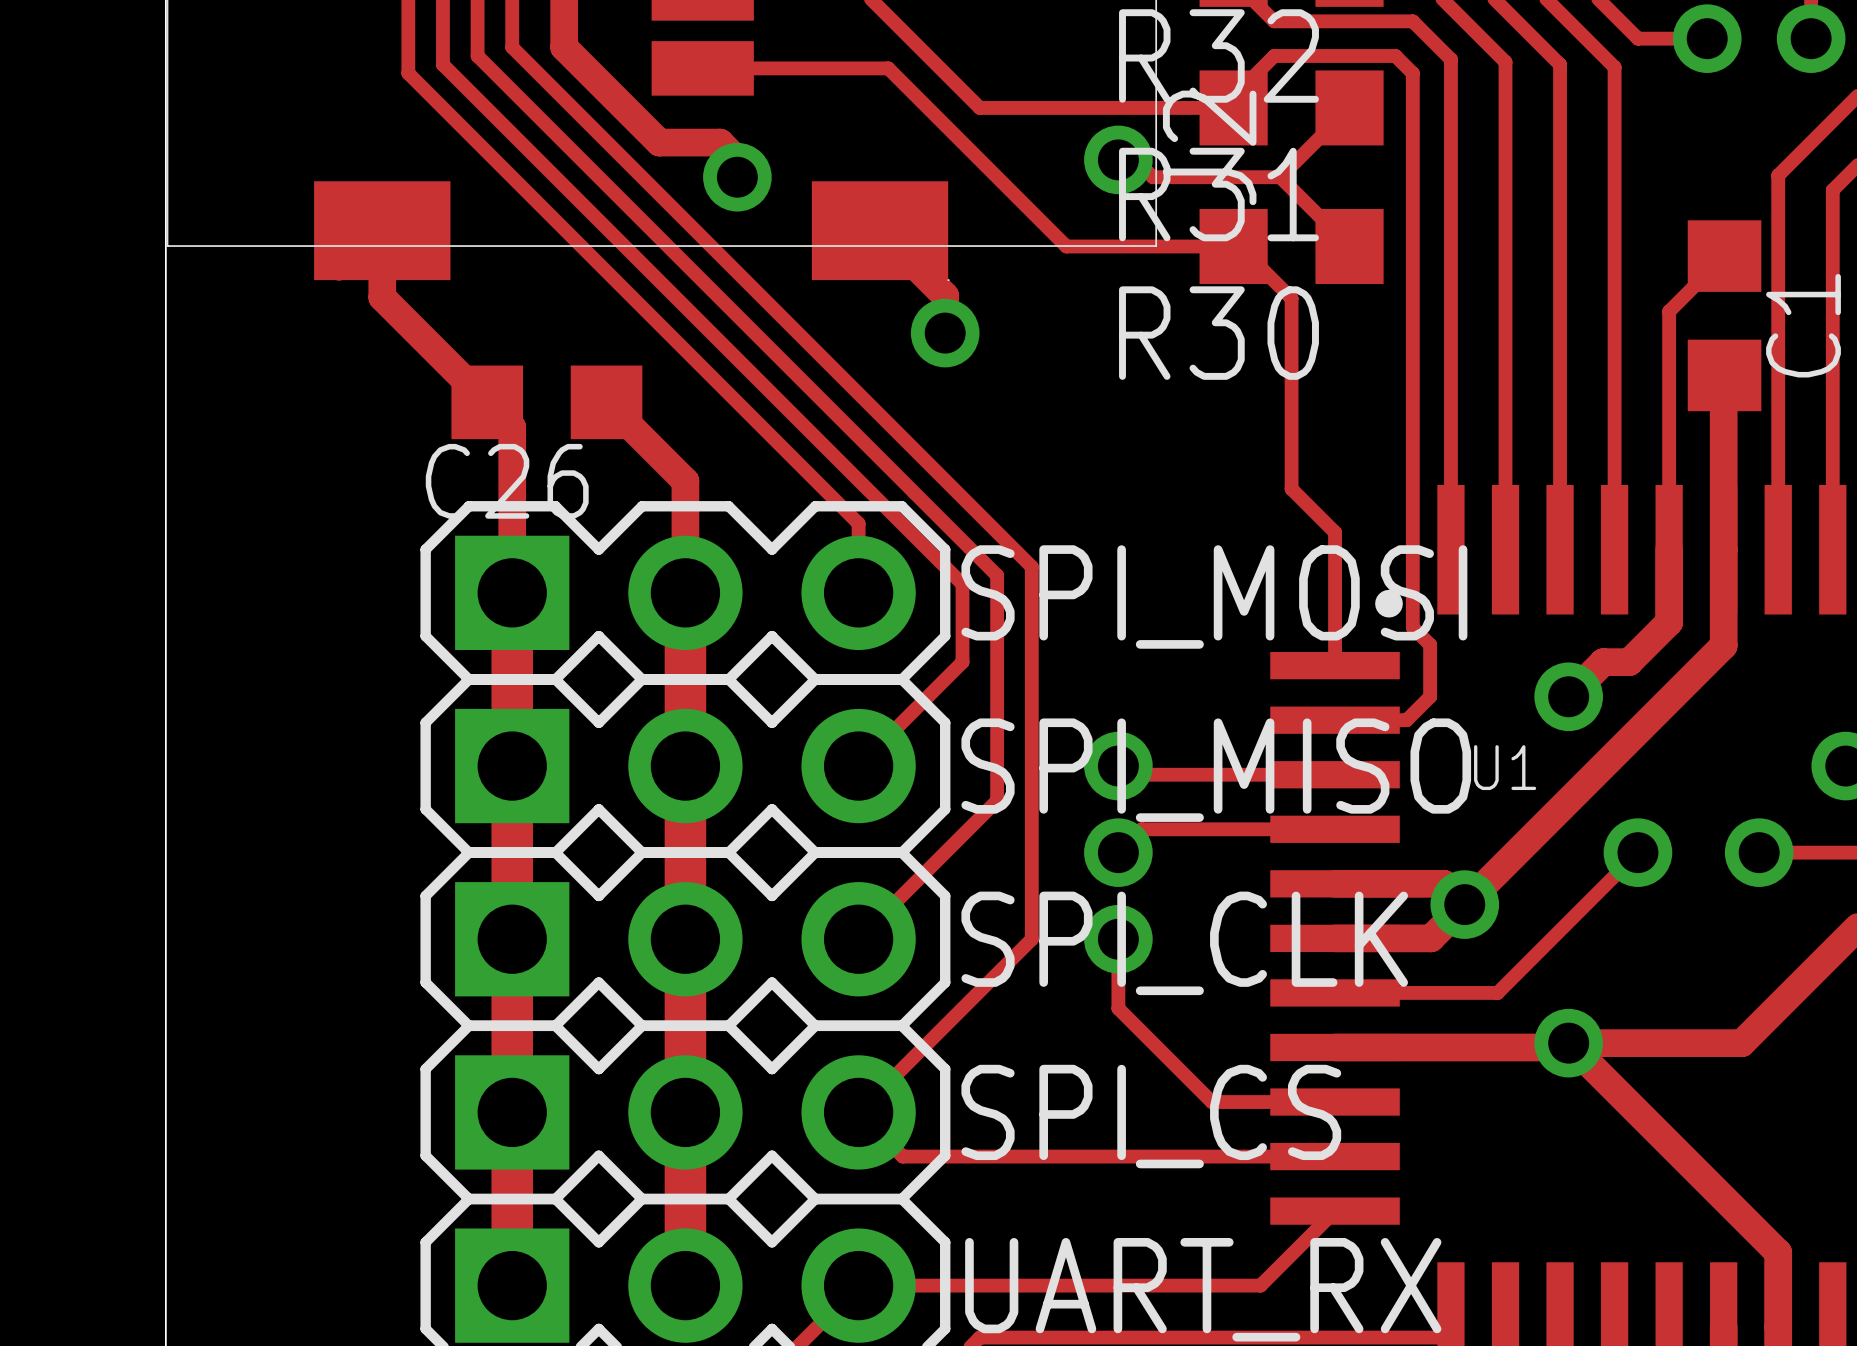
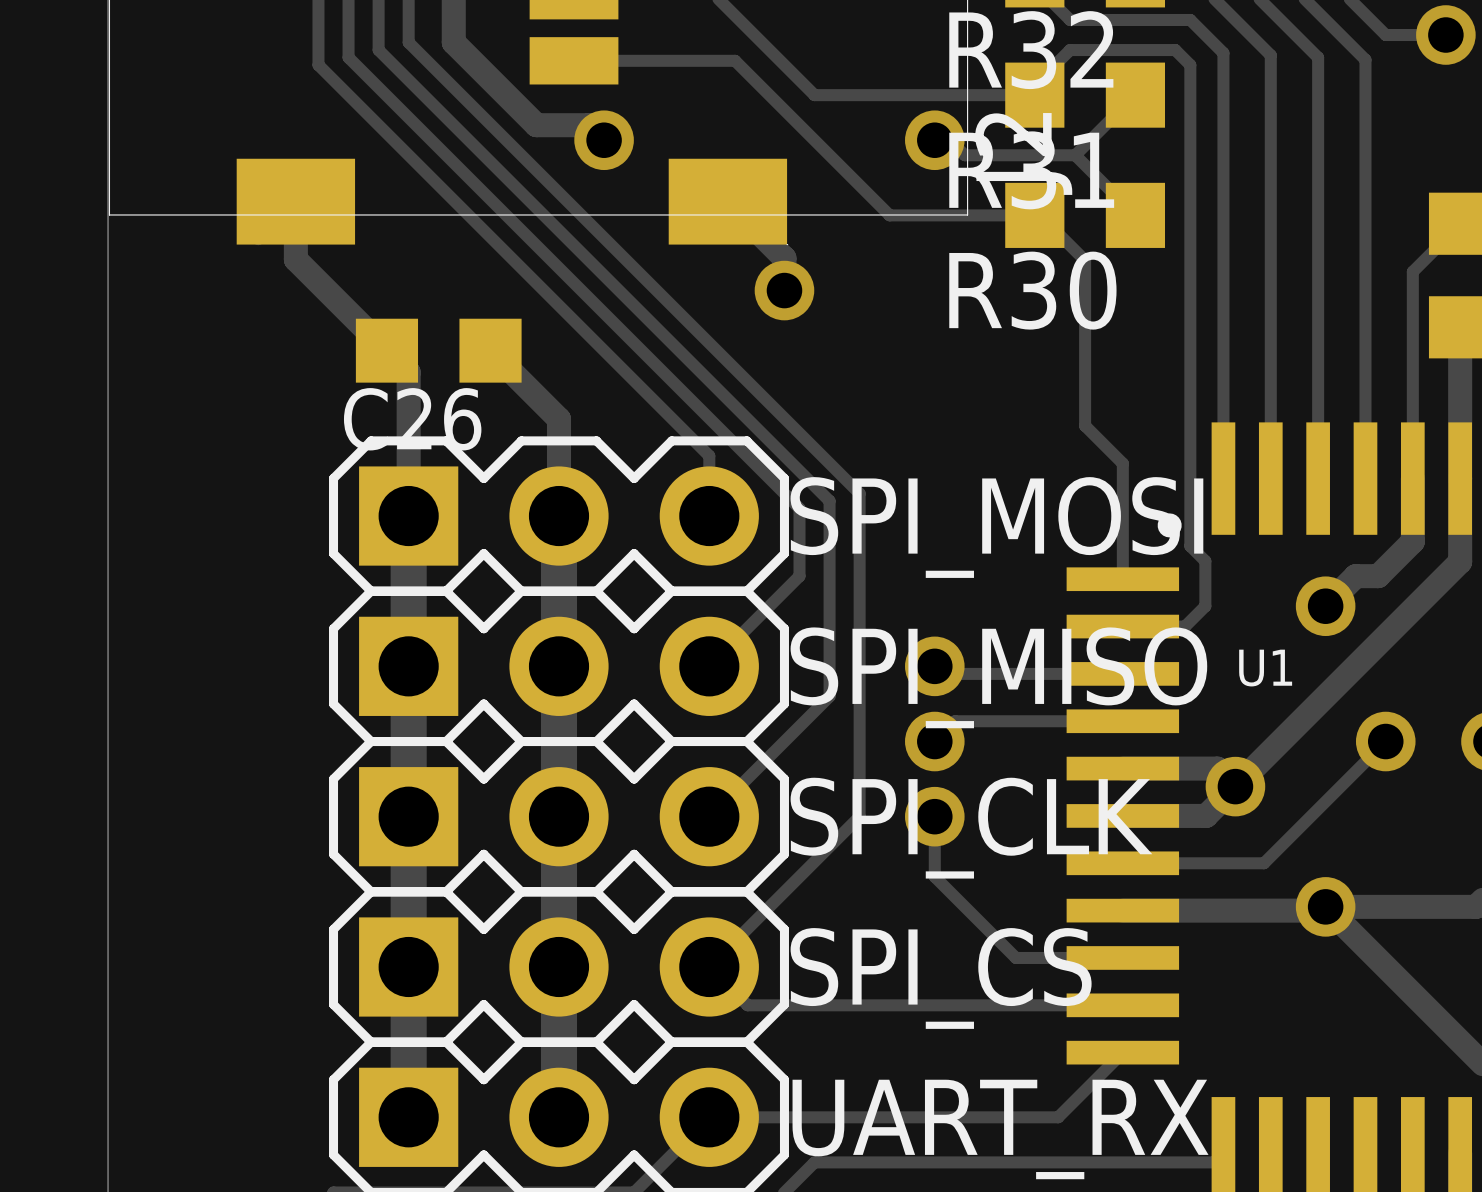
via position: (737, 177) -> (604, 140)

